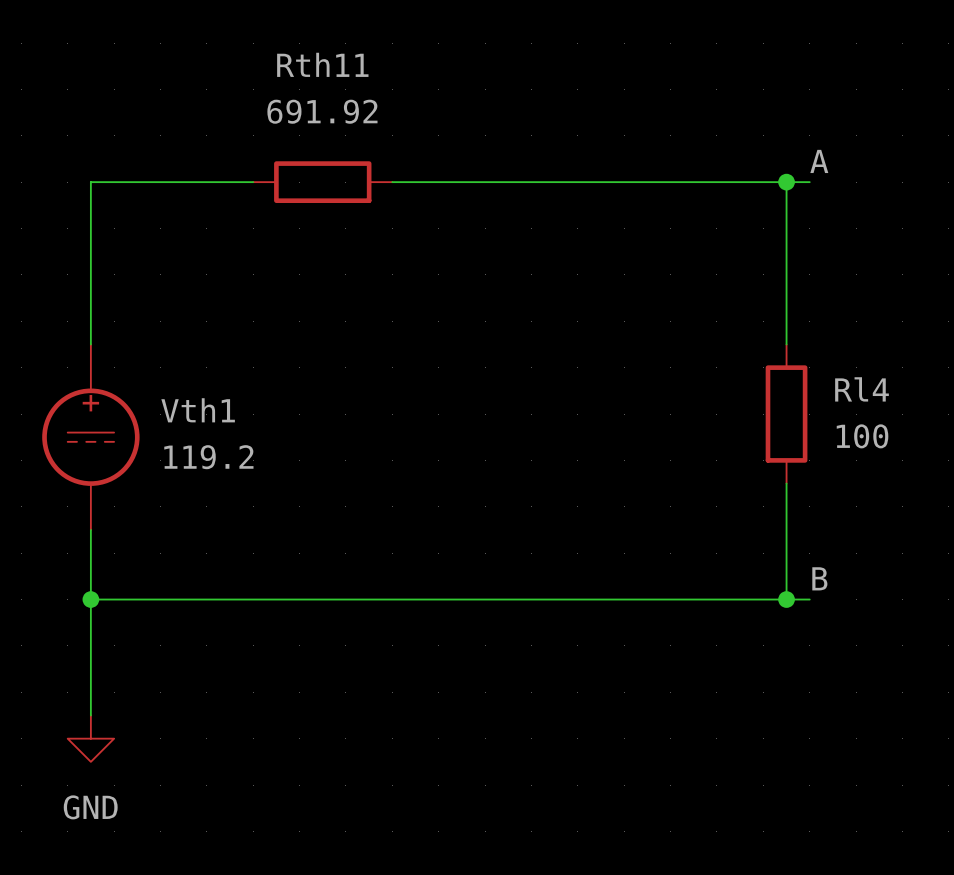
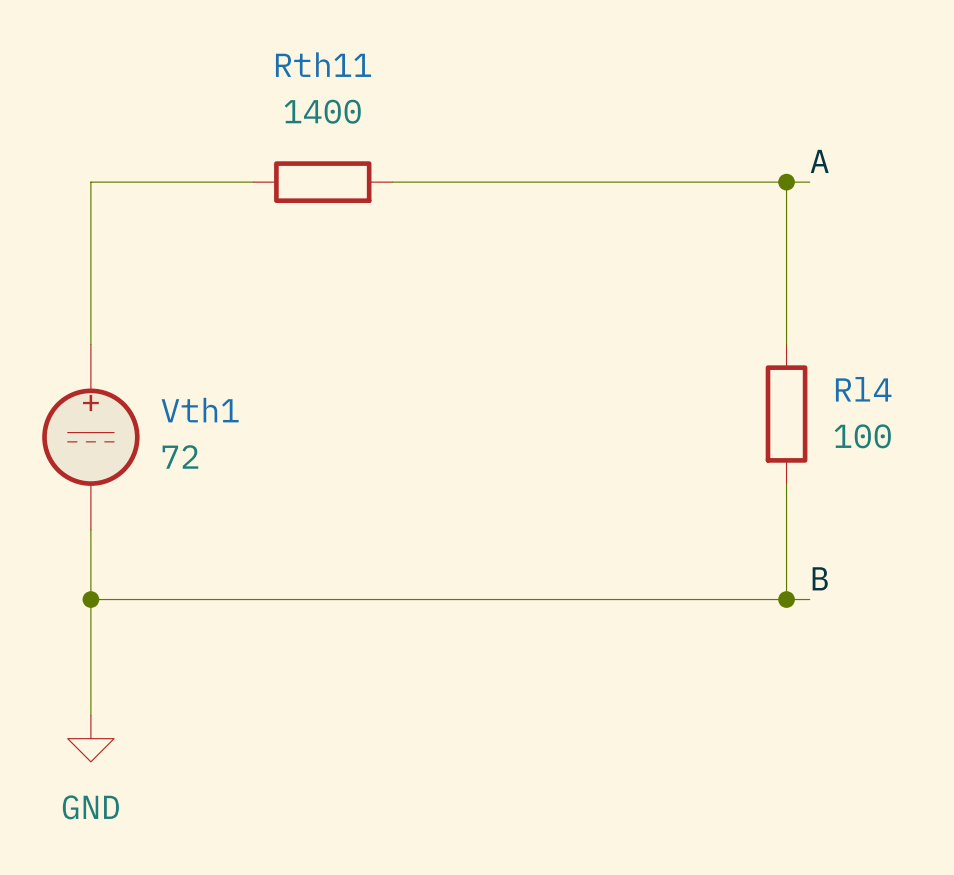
Rth11 value: 691.92 (322, 111) -> 1400 (322, 111)
Vth1 value: 119.2 (208, 457) -> 72 (180, 456)

